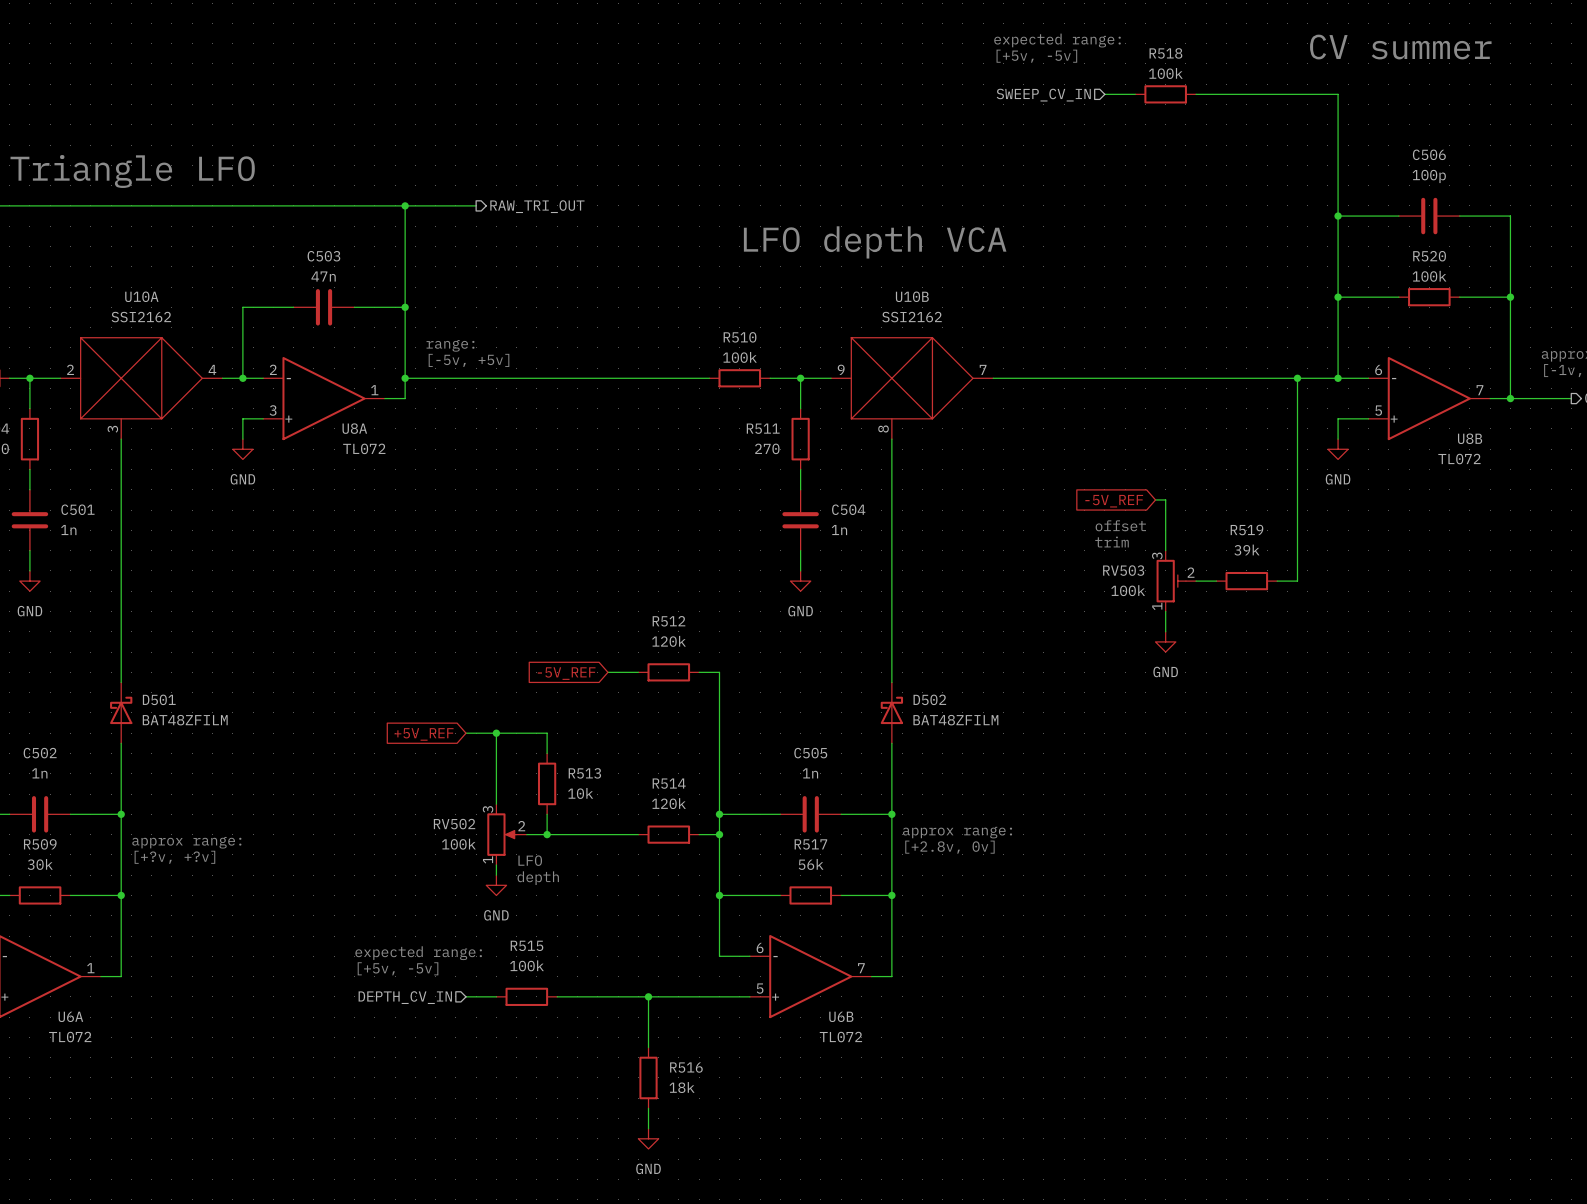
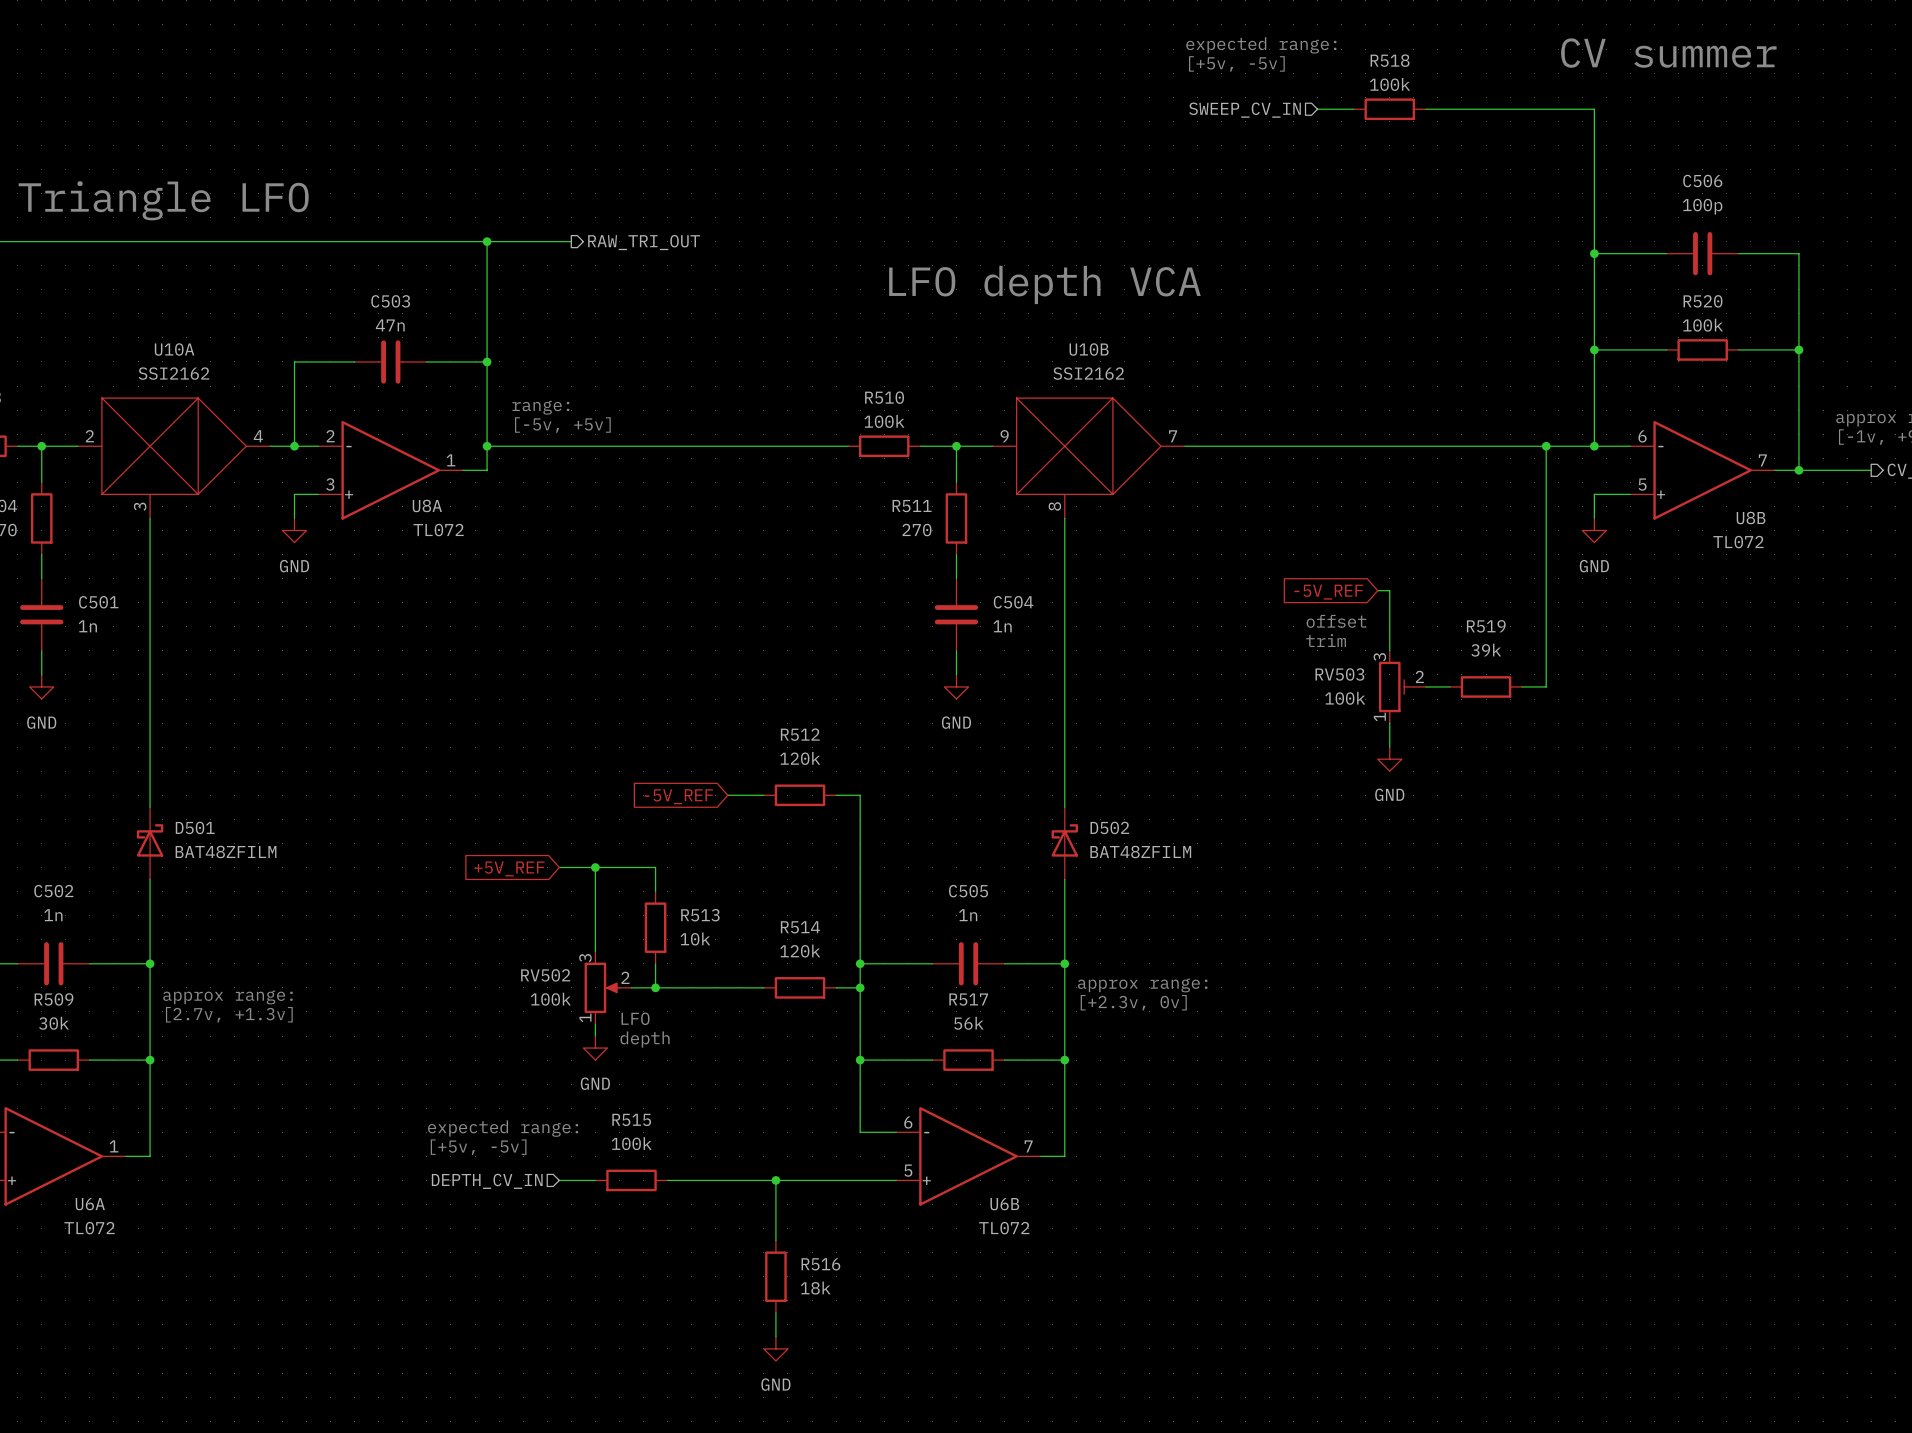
text: [+2.8v, 0v] (949, 847) -> [+2.3v, 0v] (1133, 1002)
text: [+?v, +?v] (174, 857) -> [2.7v, +1.3v] (229, 1014)

